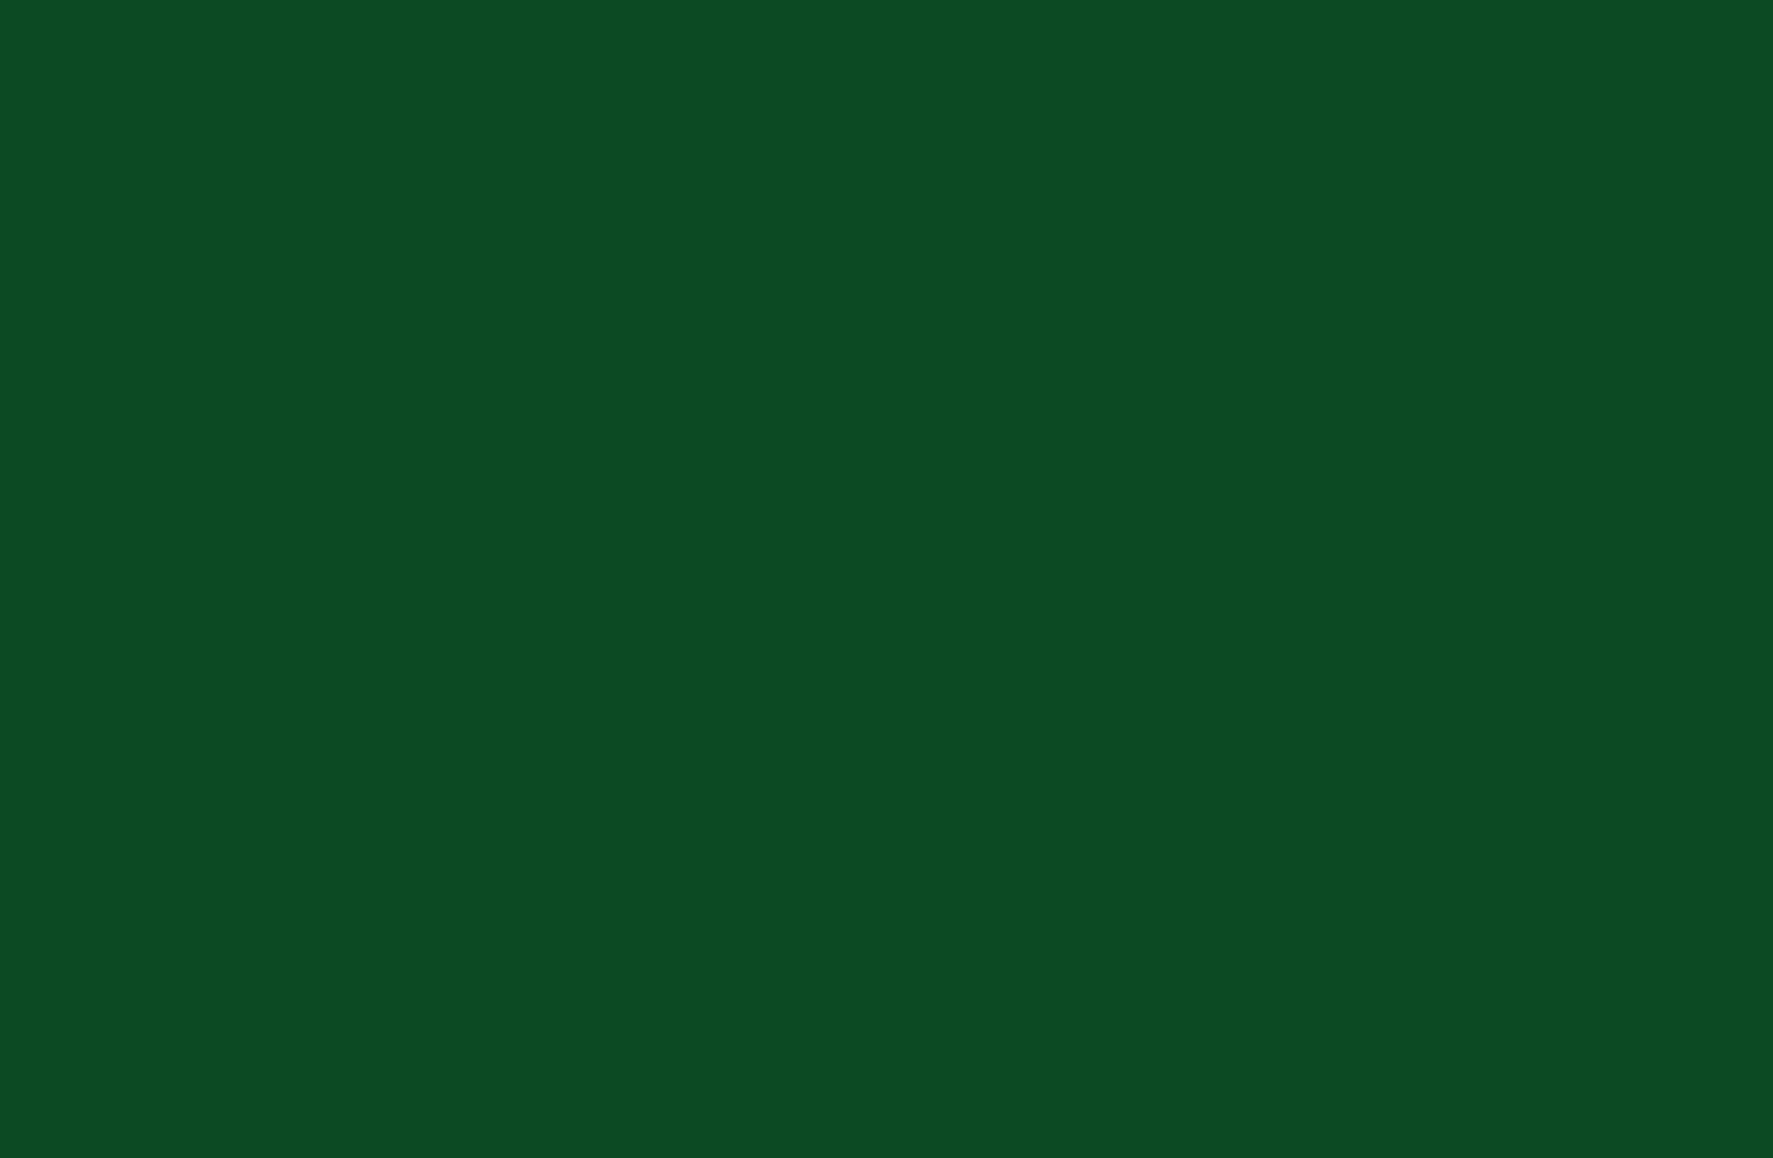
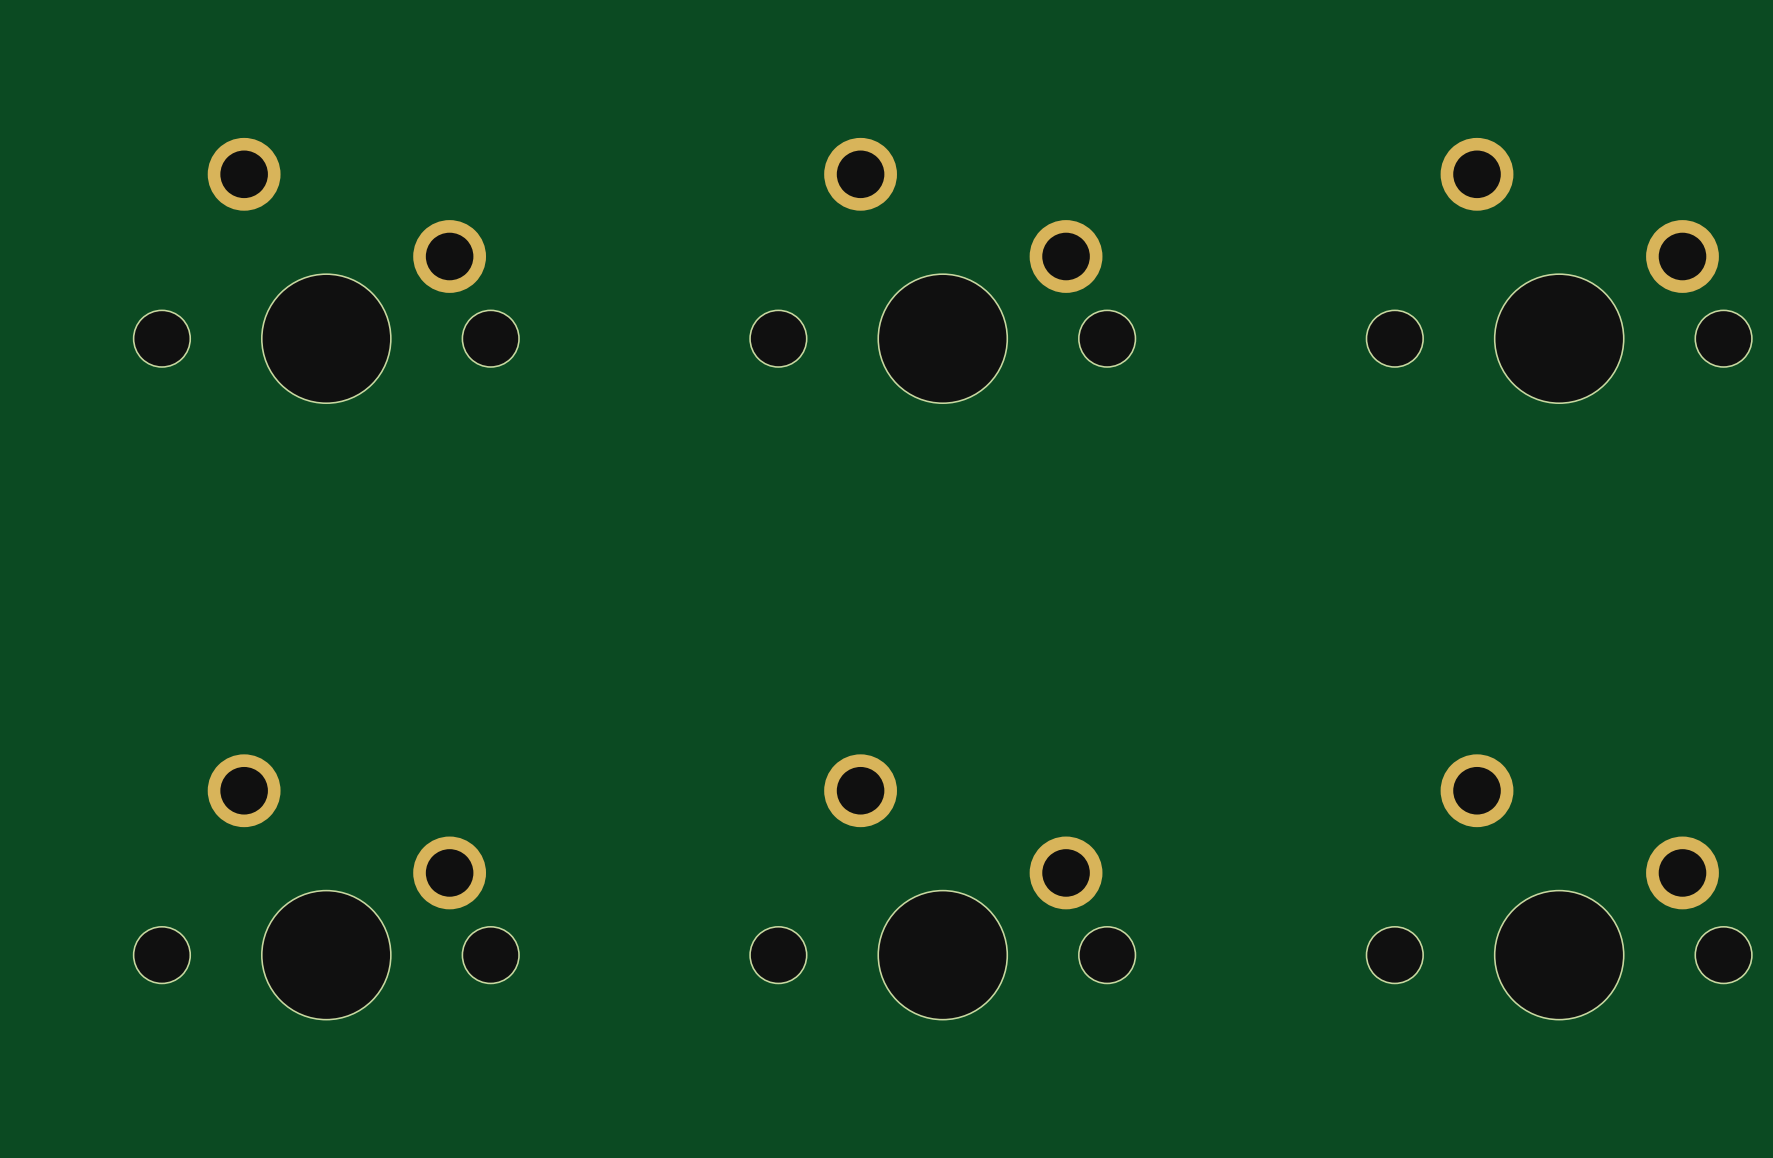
part: none -> (326, 270)
part: none -> (942, 270)
part: none -> (1559, 270)
part: none -> (326, 887)
part: none -> (942, 887)
part: none -> (1559, 887)

